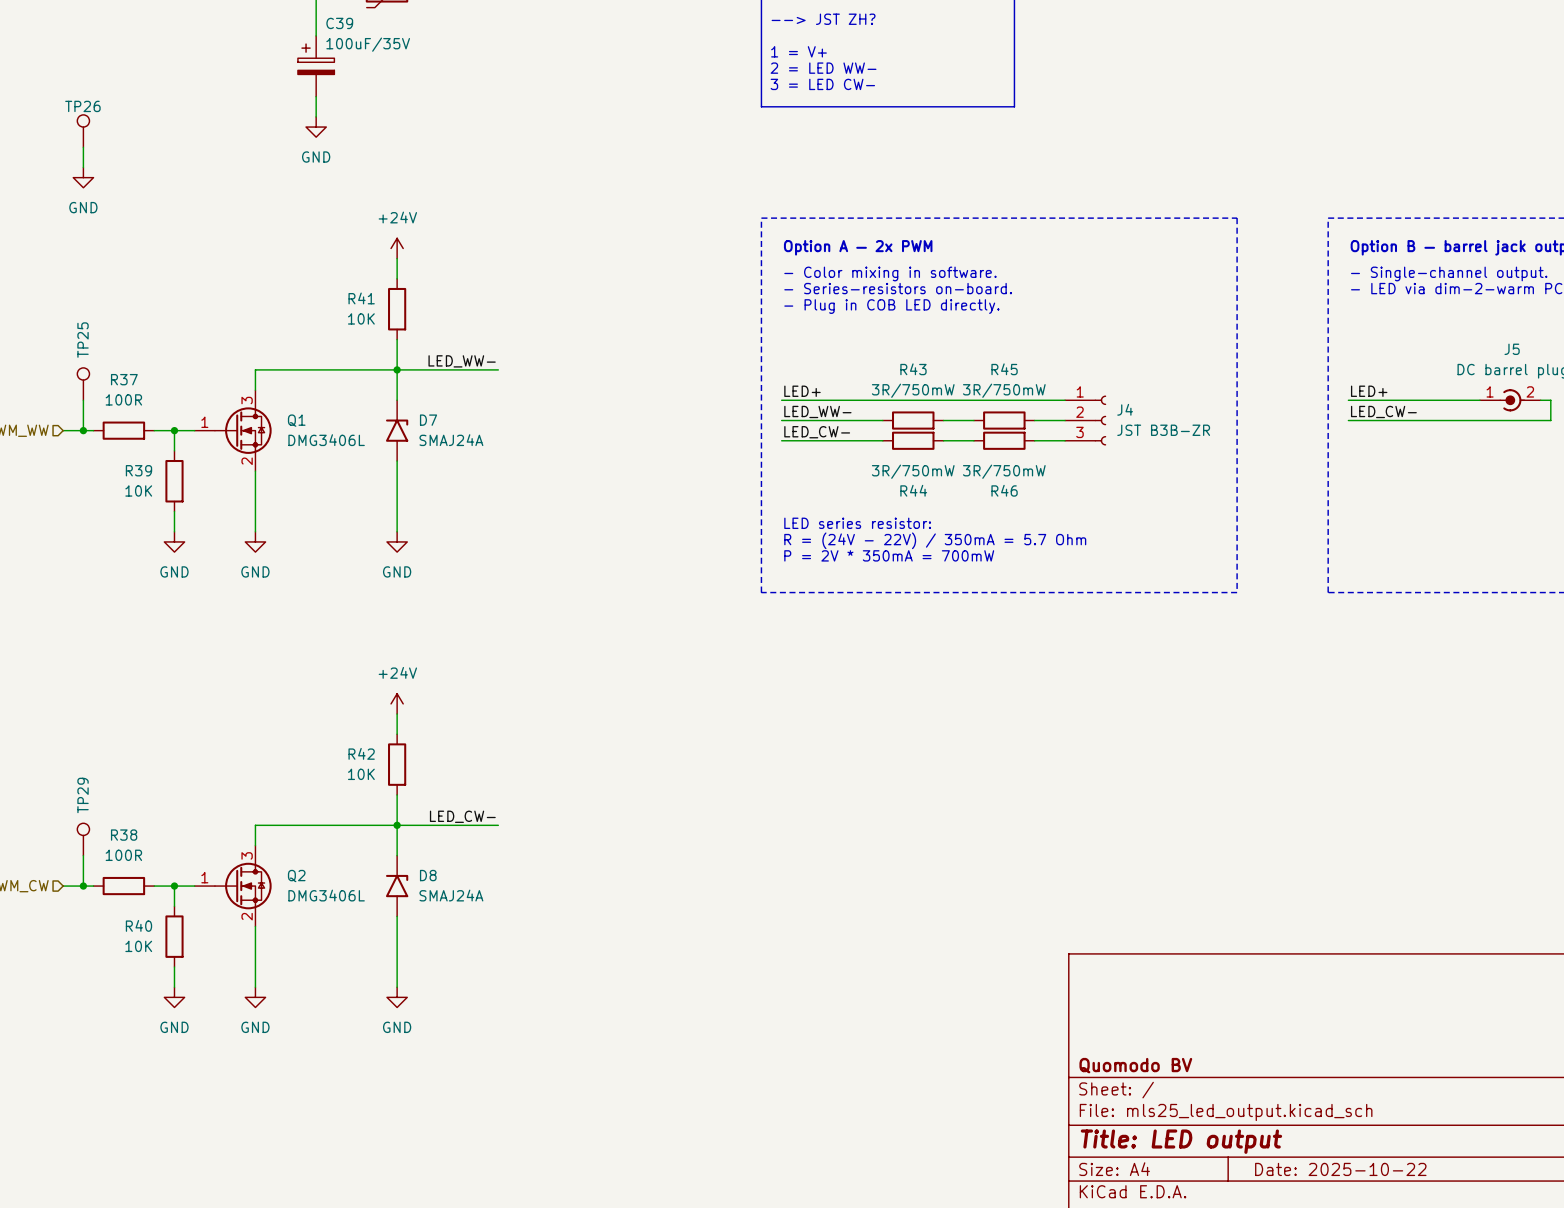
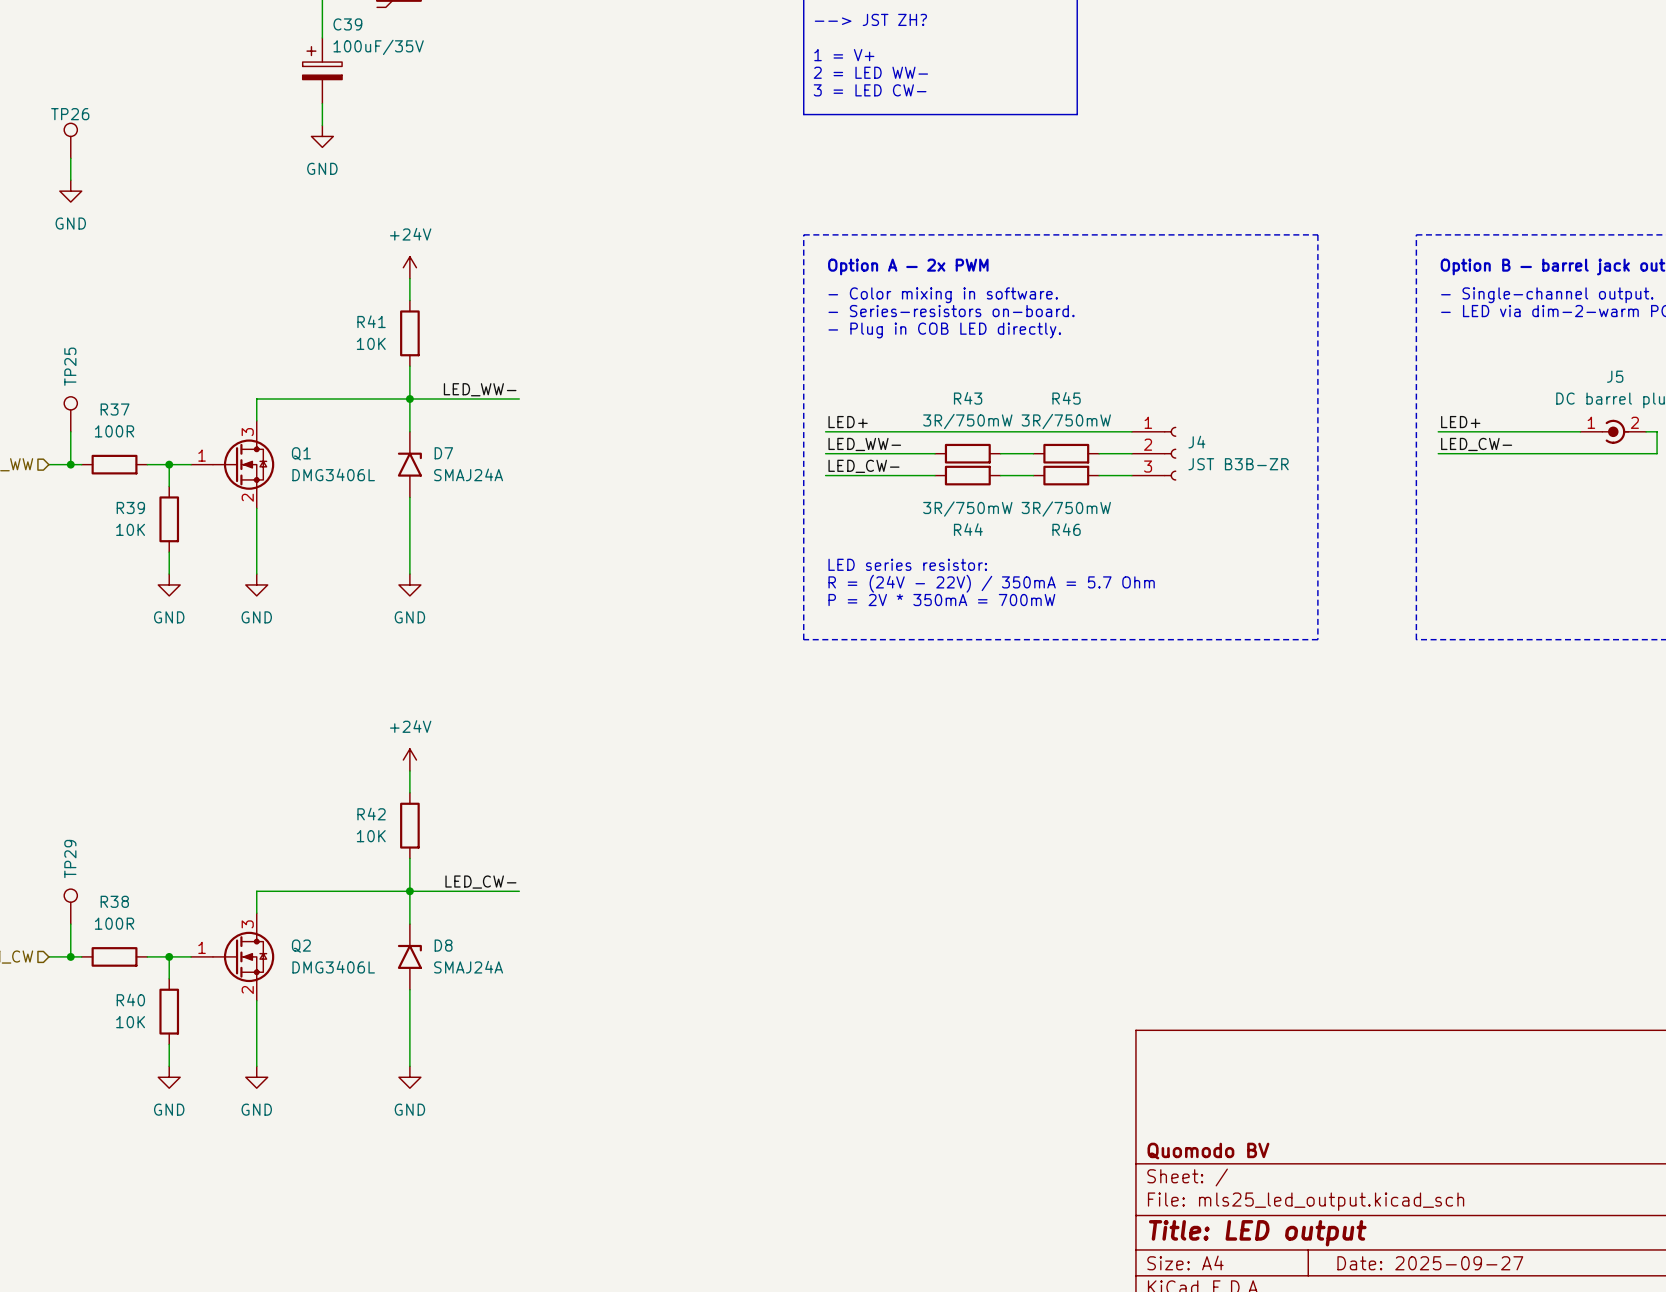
title block: Date: 2025-10-22 (1340, 1169) -> Date: 2025-09-27 (1430, 1263)

